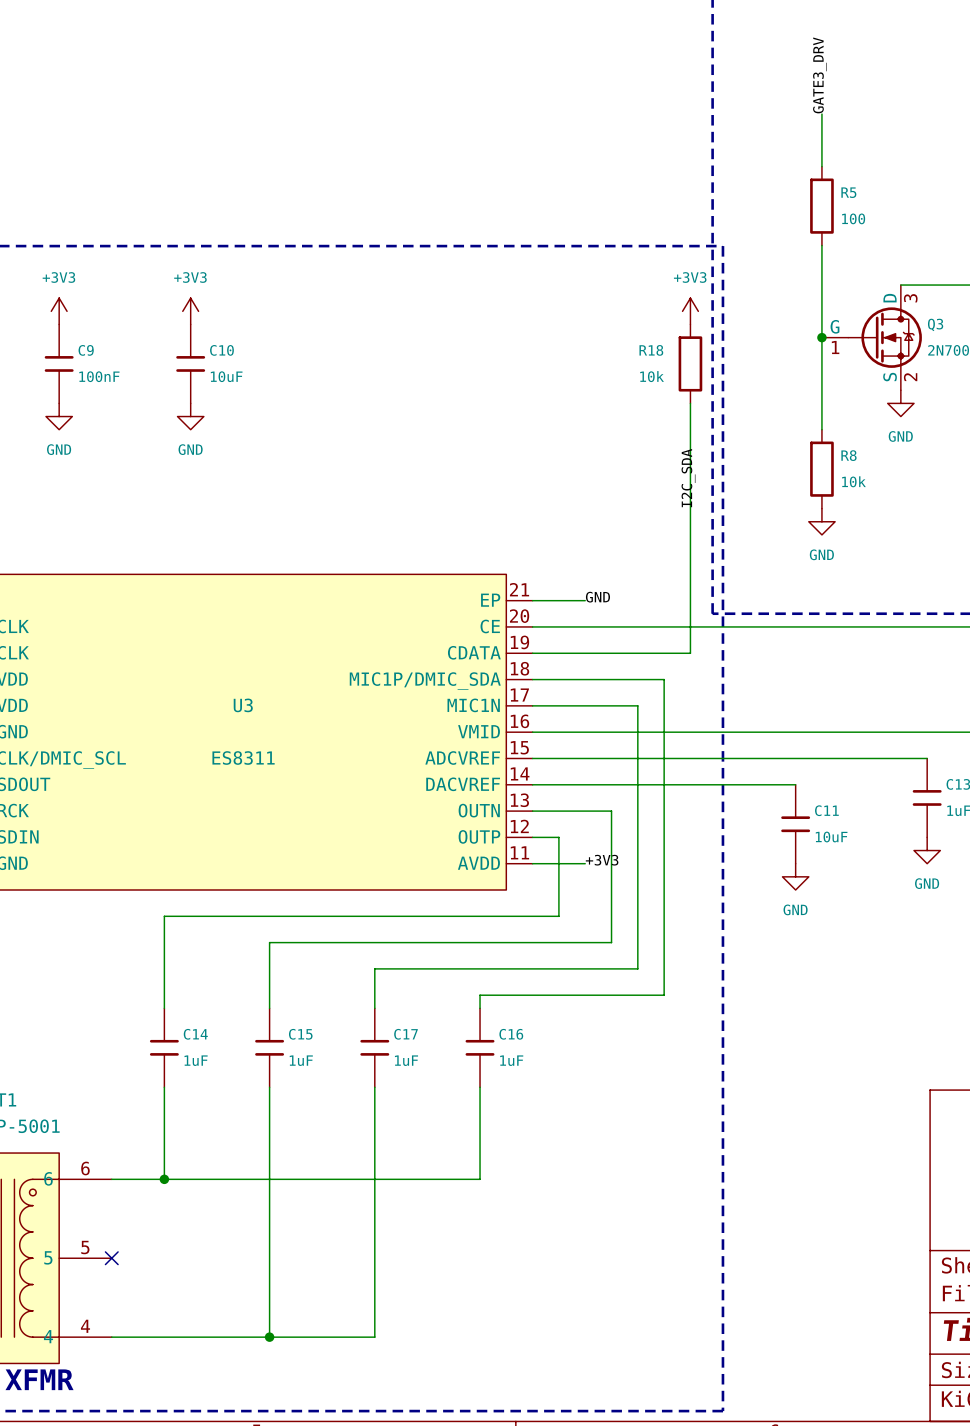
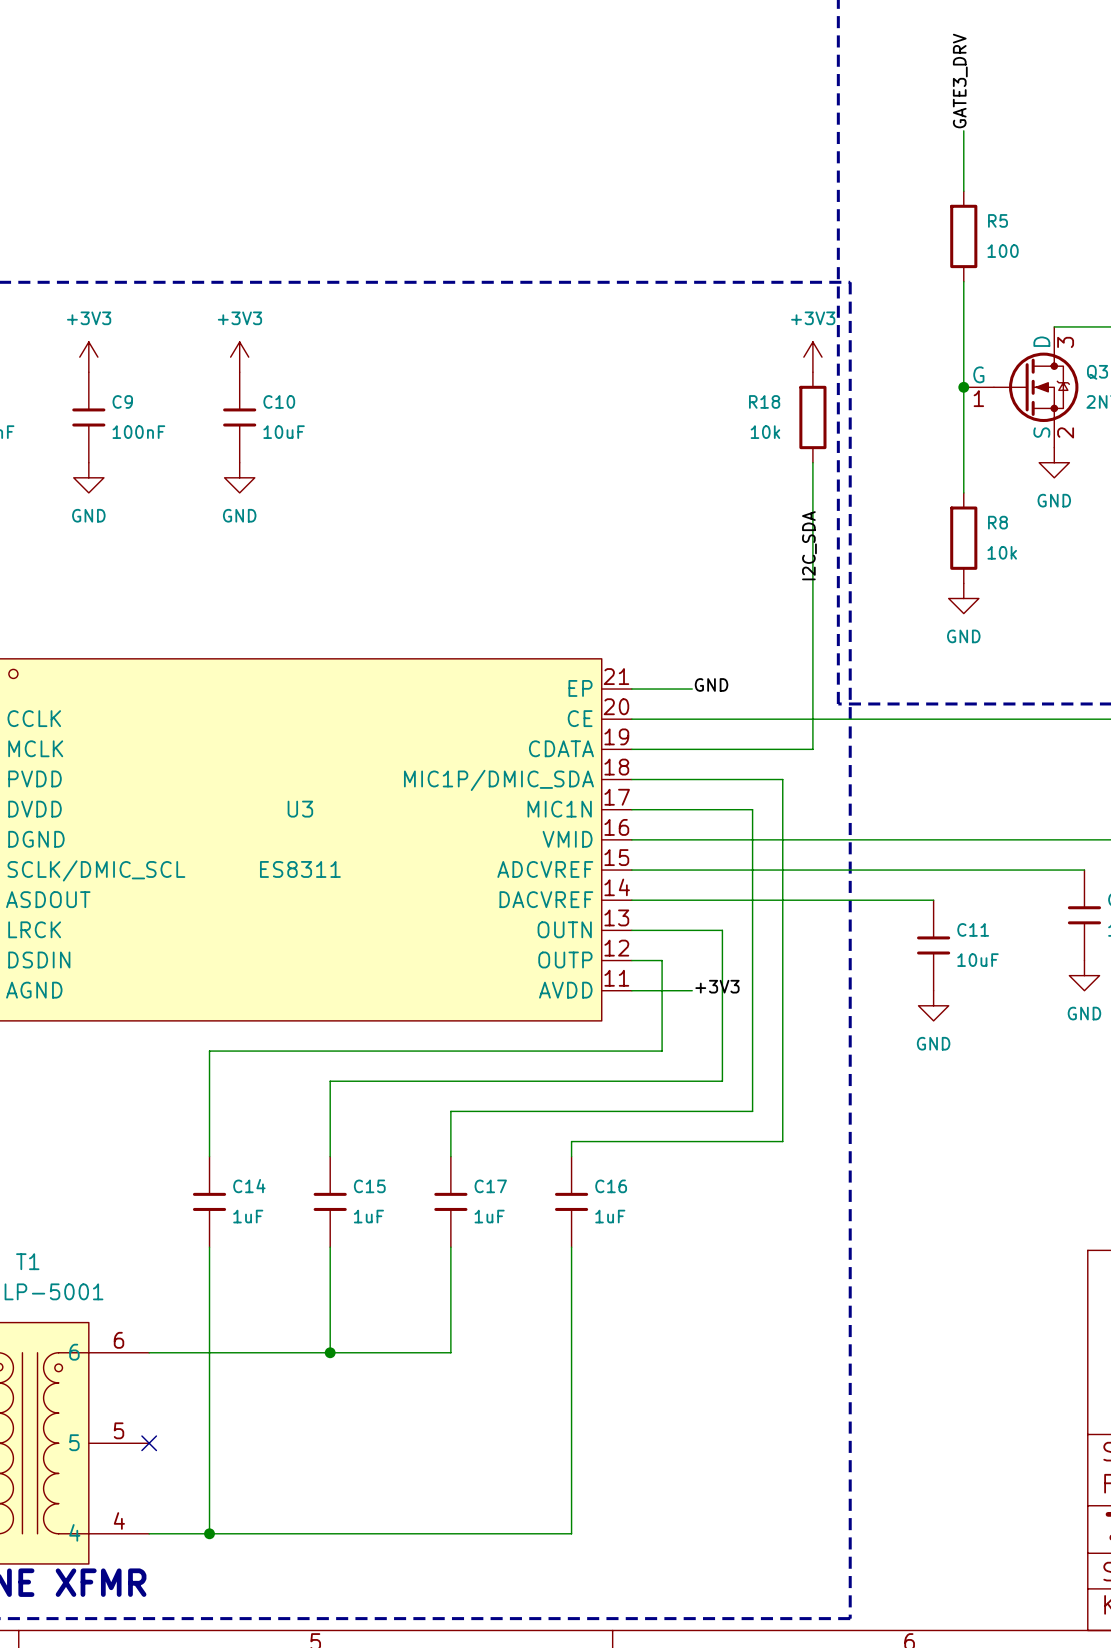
junction: (164, 1179) -> none
wire: (269, 1179) (269, 1337) -> (209, 1352) (209, 1533)
junction: none -> (330, 1352)
wire: (480, 1179) (374, 1179) (374, 1337) -> (571, 1352) (571, 1533) (450, 1533)
junction: none -> (209, 1533)
junction: (269, 1337) -> none

